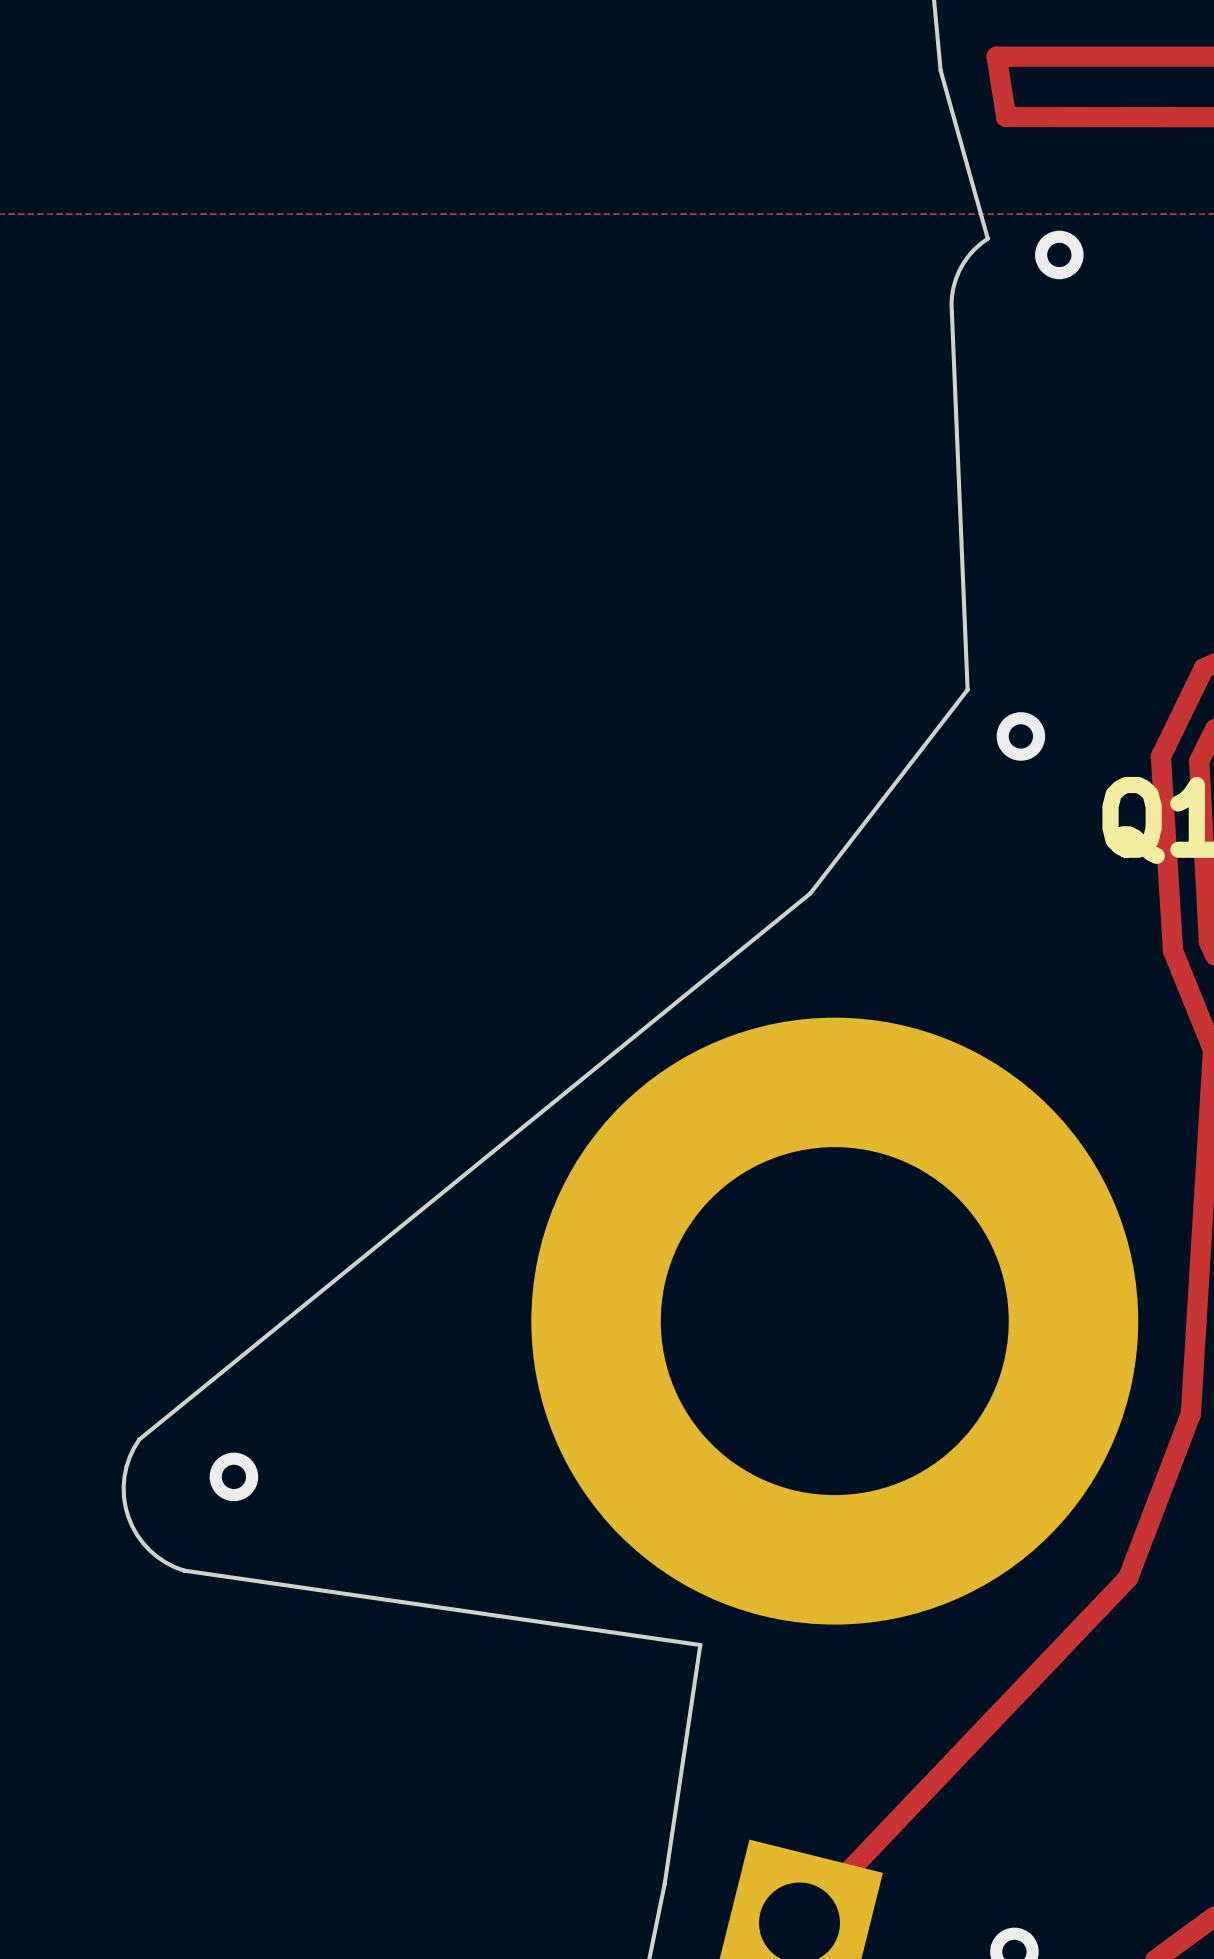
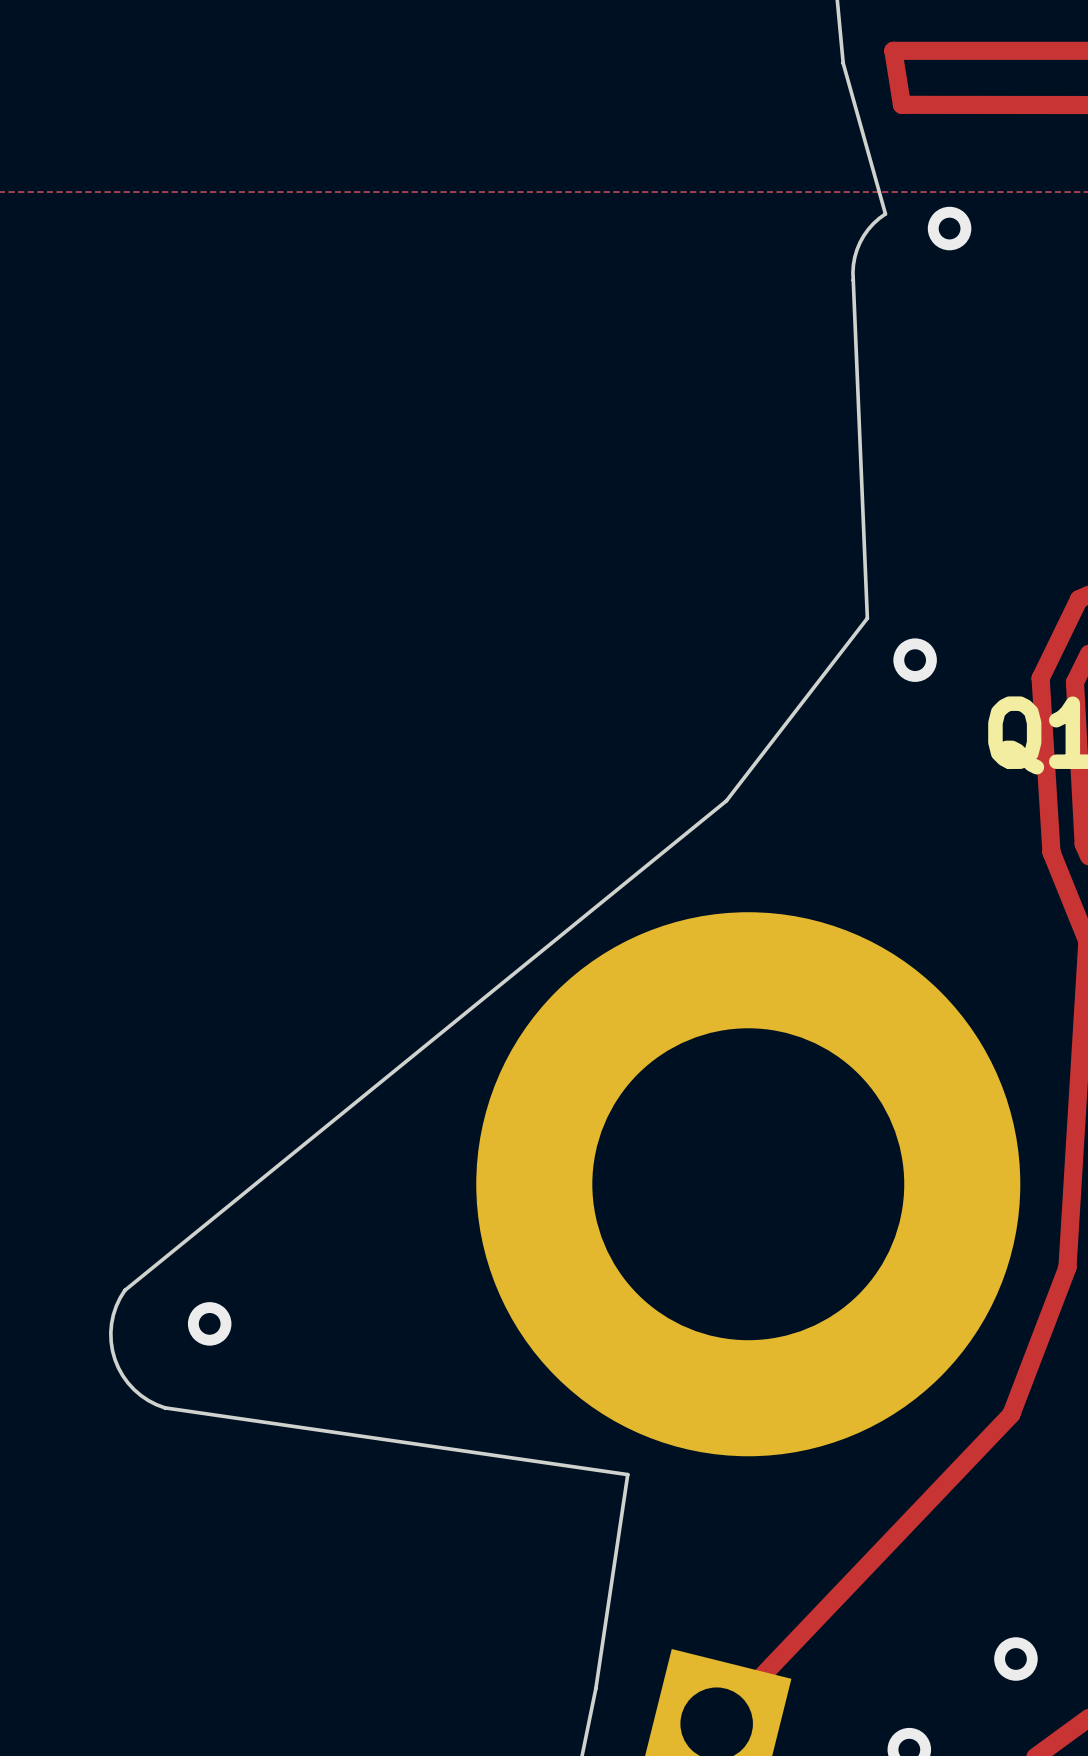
via: none -> (1015, 1659)

